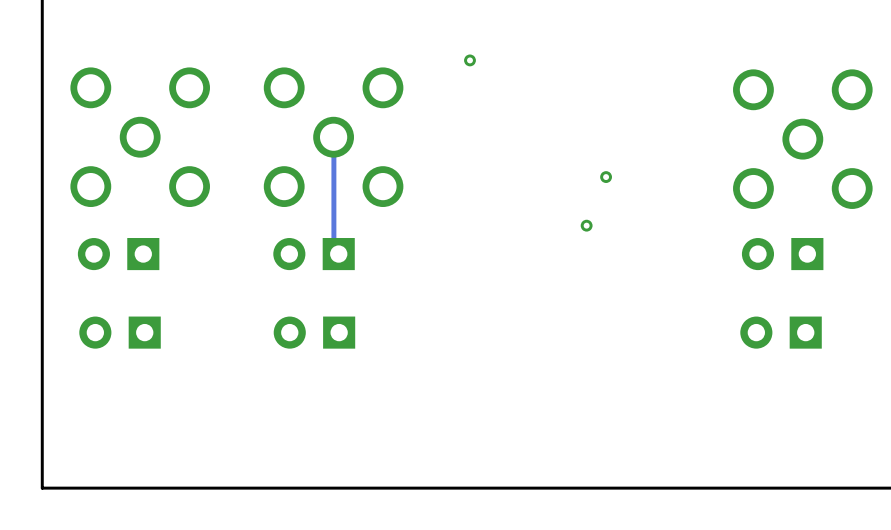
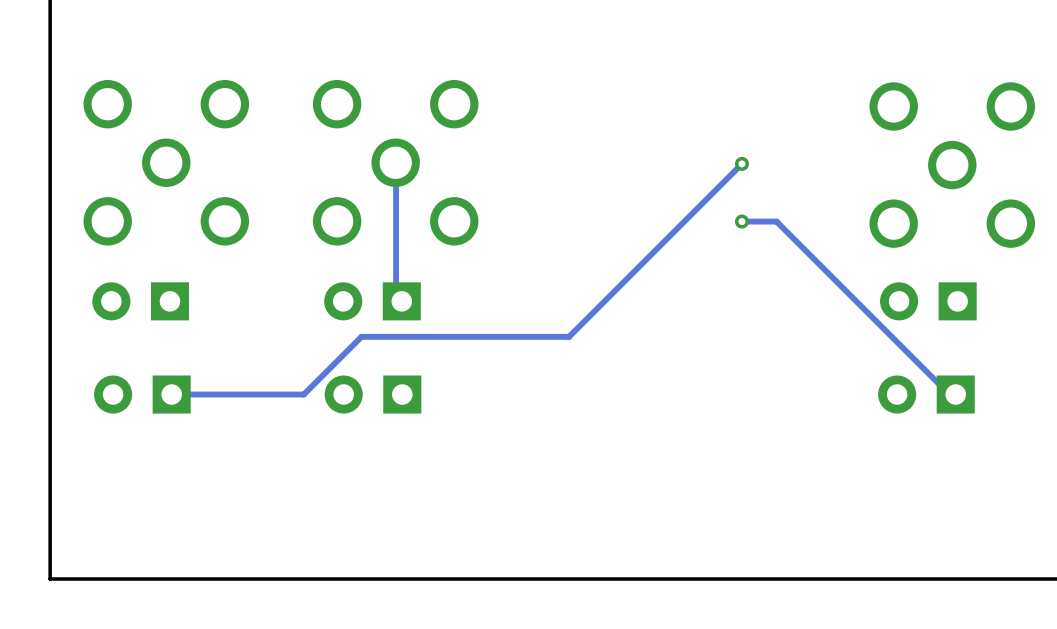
via: (469, 60) -> none
track: none -> (741, 163) (569, 336) (361, 336) (303, 394) (171, 394)
via: none -> (741, 163)
via: (606, 177) -> none
track: none -> (741, 221) (776, 221) (949, 394) (955, 394)
via: none -> (741, 221)
via: (586, 225) -> none

